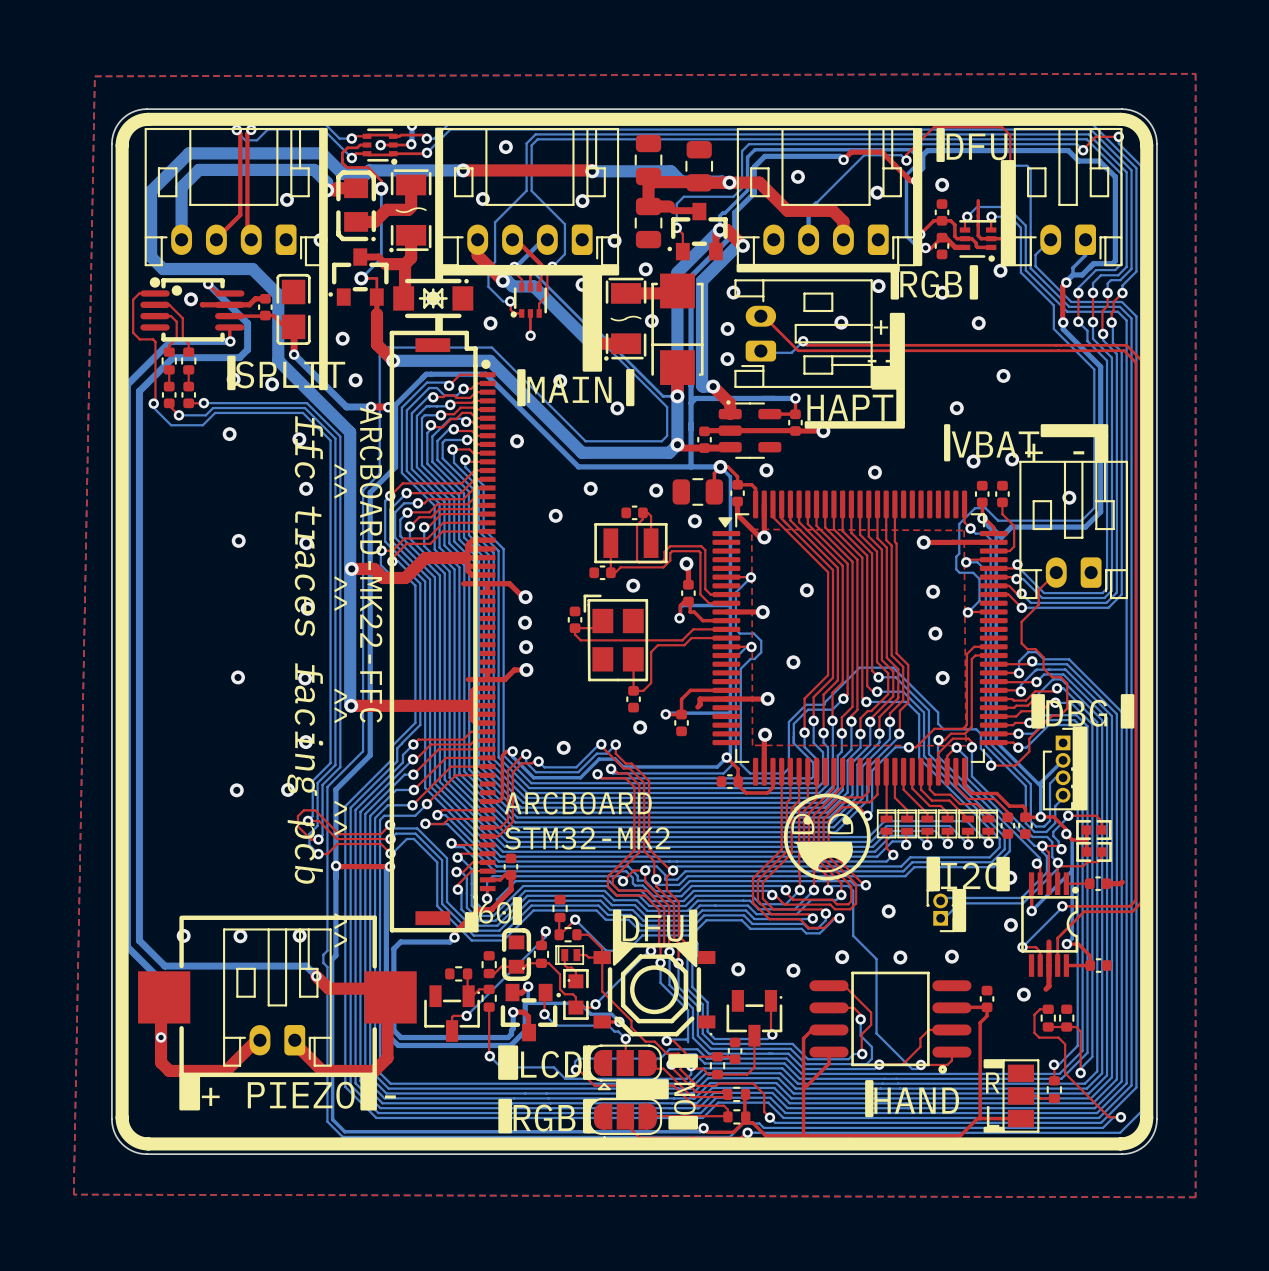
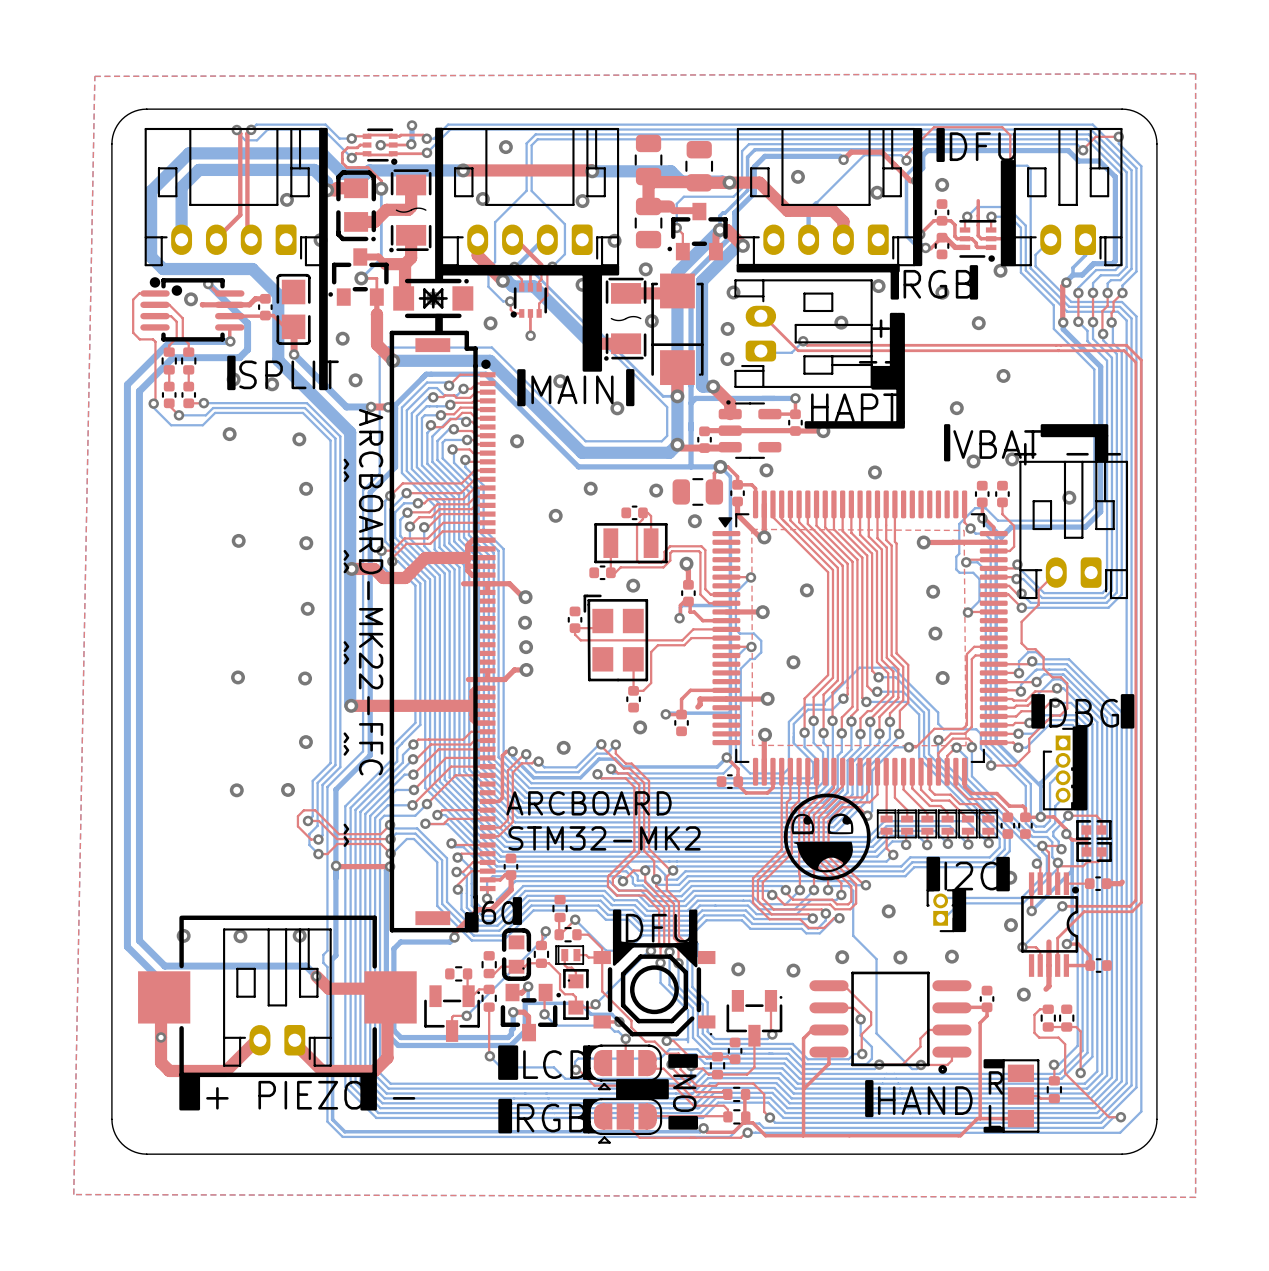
line: (148, 119) (1120, 119) (1130, 121) (1139, 126) (1144, 135) (1146, 145) (1146, 1117) (1144, 1127) (1139, 1136) (1130, 1141) (1120, 1143) (148, 1143) (138, 1141) (129, 1136) (124, 1127) (122, 1117) (122, 145) (124, 135) (129, 126) (138, 121) (148, 119) -> none
text: ffc traces facing pcb (305, 650) -> none

